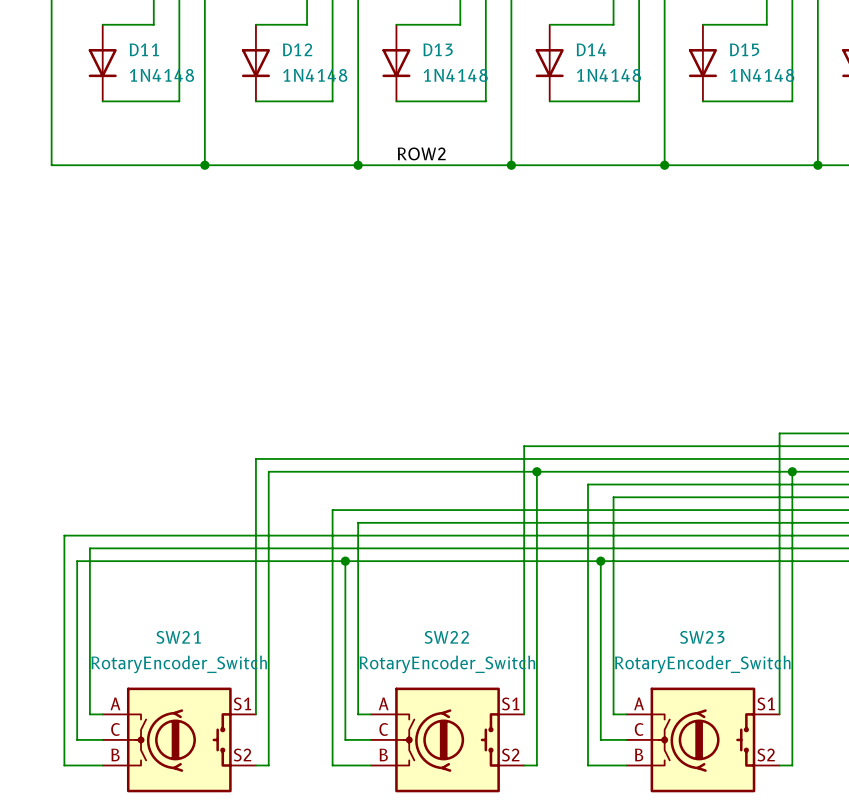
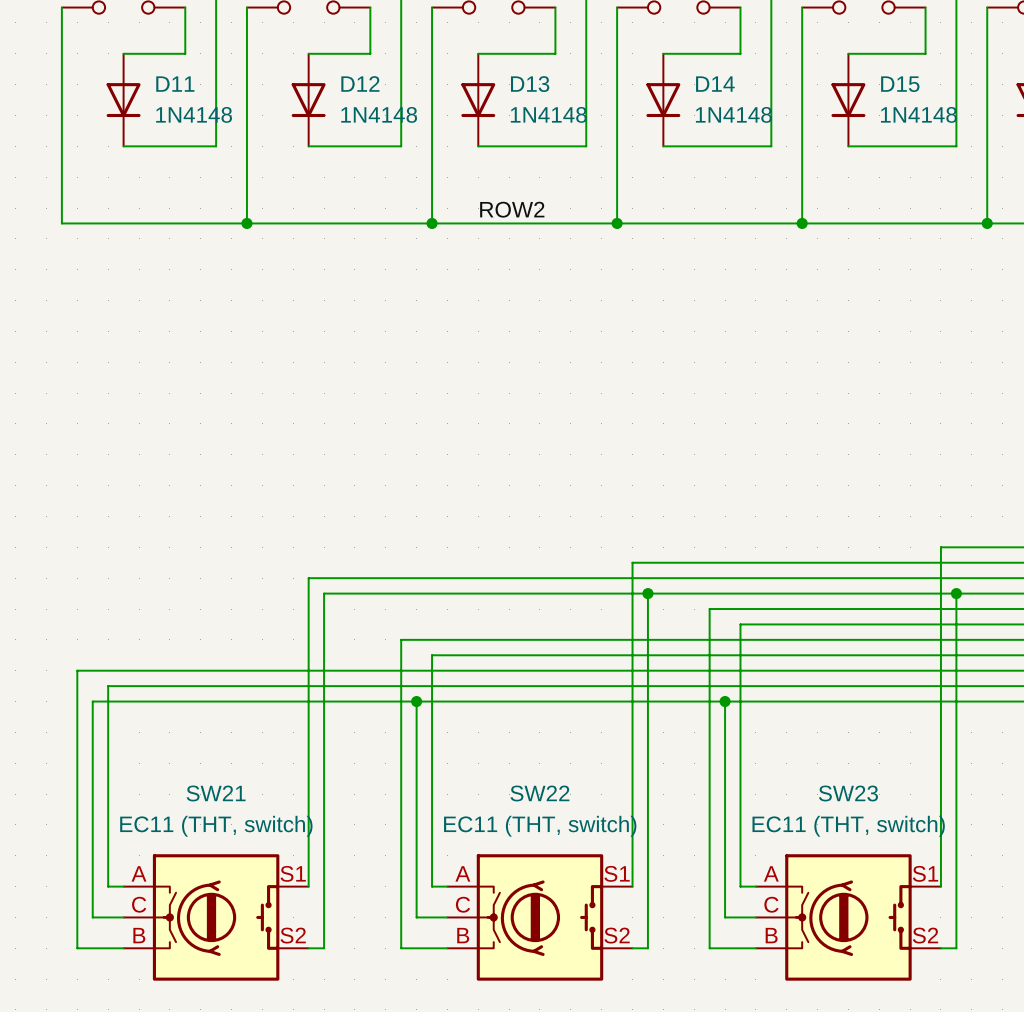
SW21 value: RotaryEncoder_Switch (179, 664) -> EC11 (THT, switch) (216, 826)
SW22 value: RotaryEncoder_Switch (447, 664) -> EC11 (THT, switch) (540, 826)
SW23 value: RotaryEncoder_Switch (702, 664) -> EC11 (THT, switch) (848, 826)

